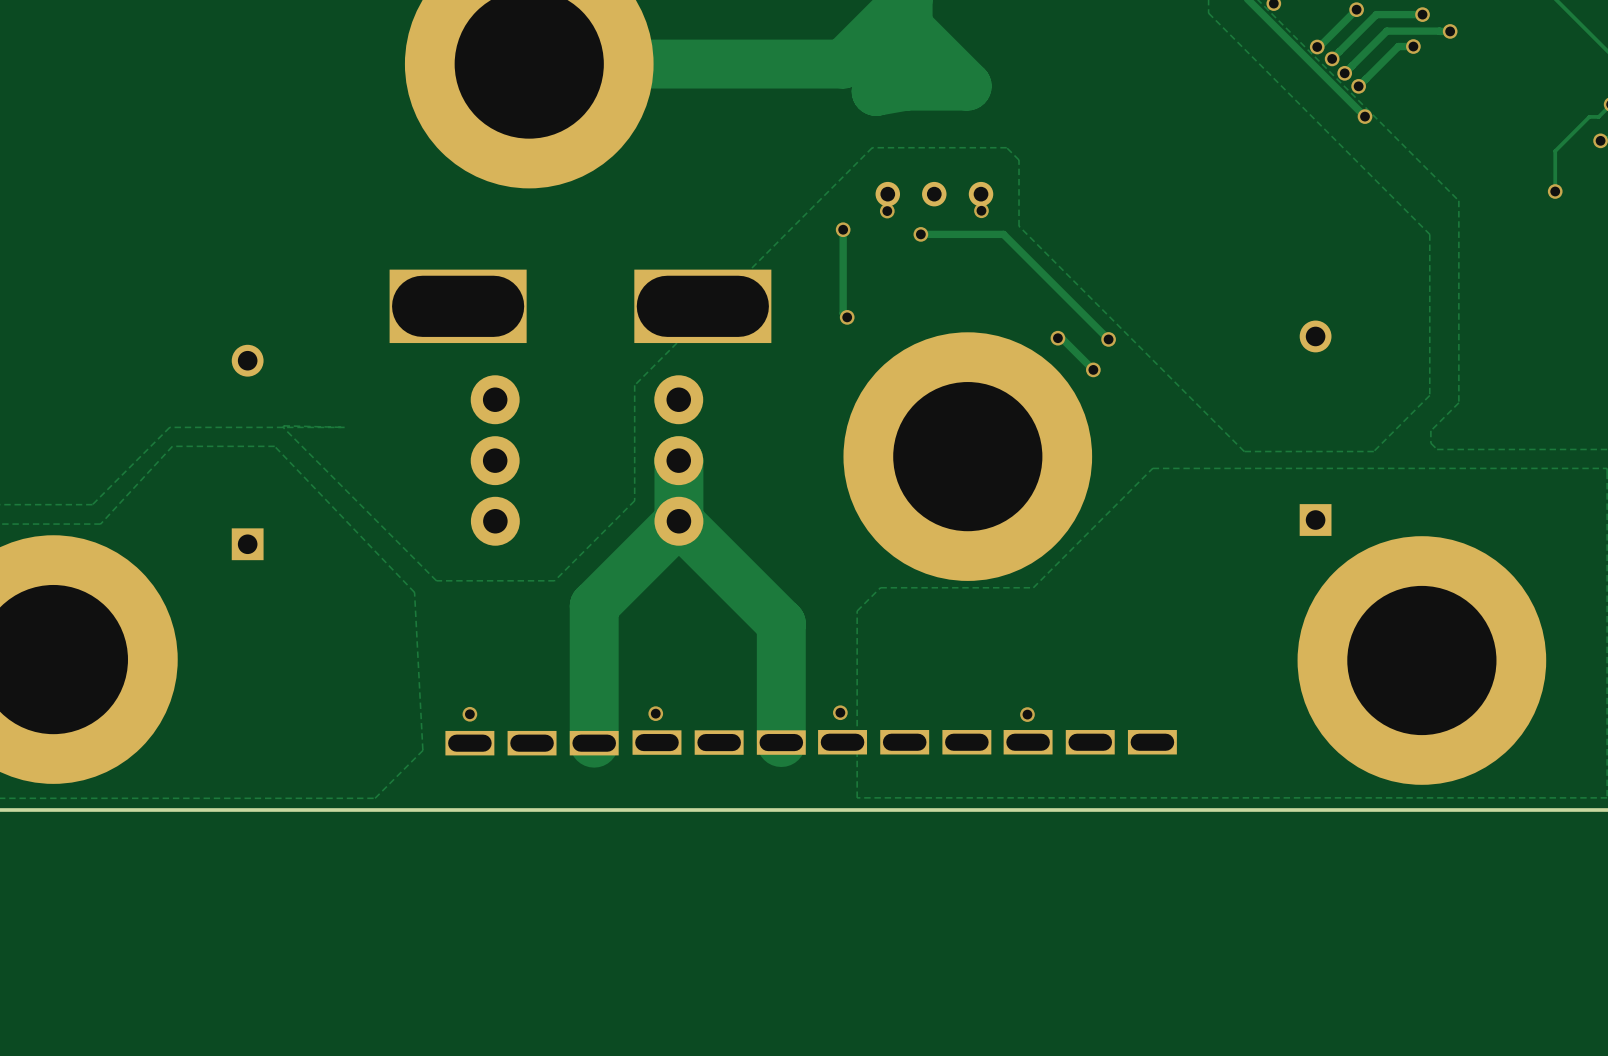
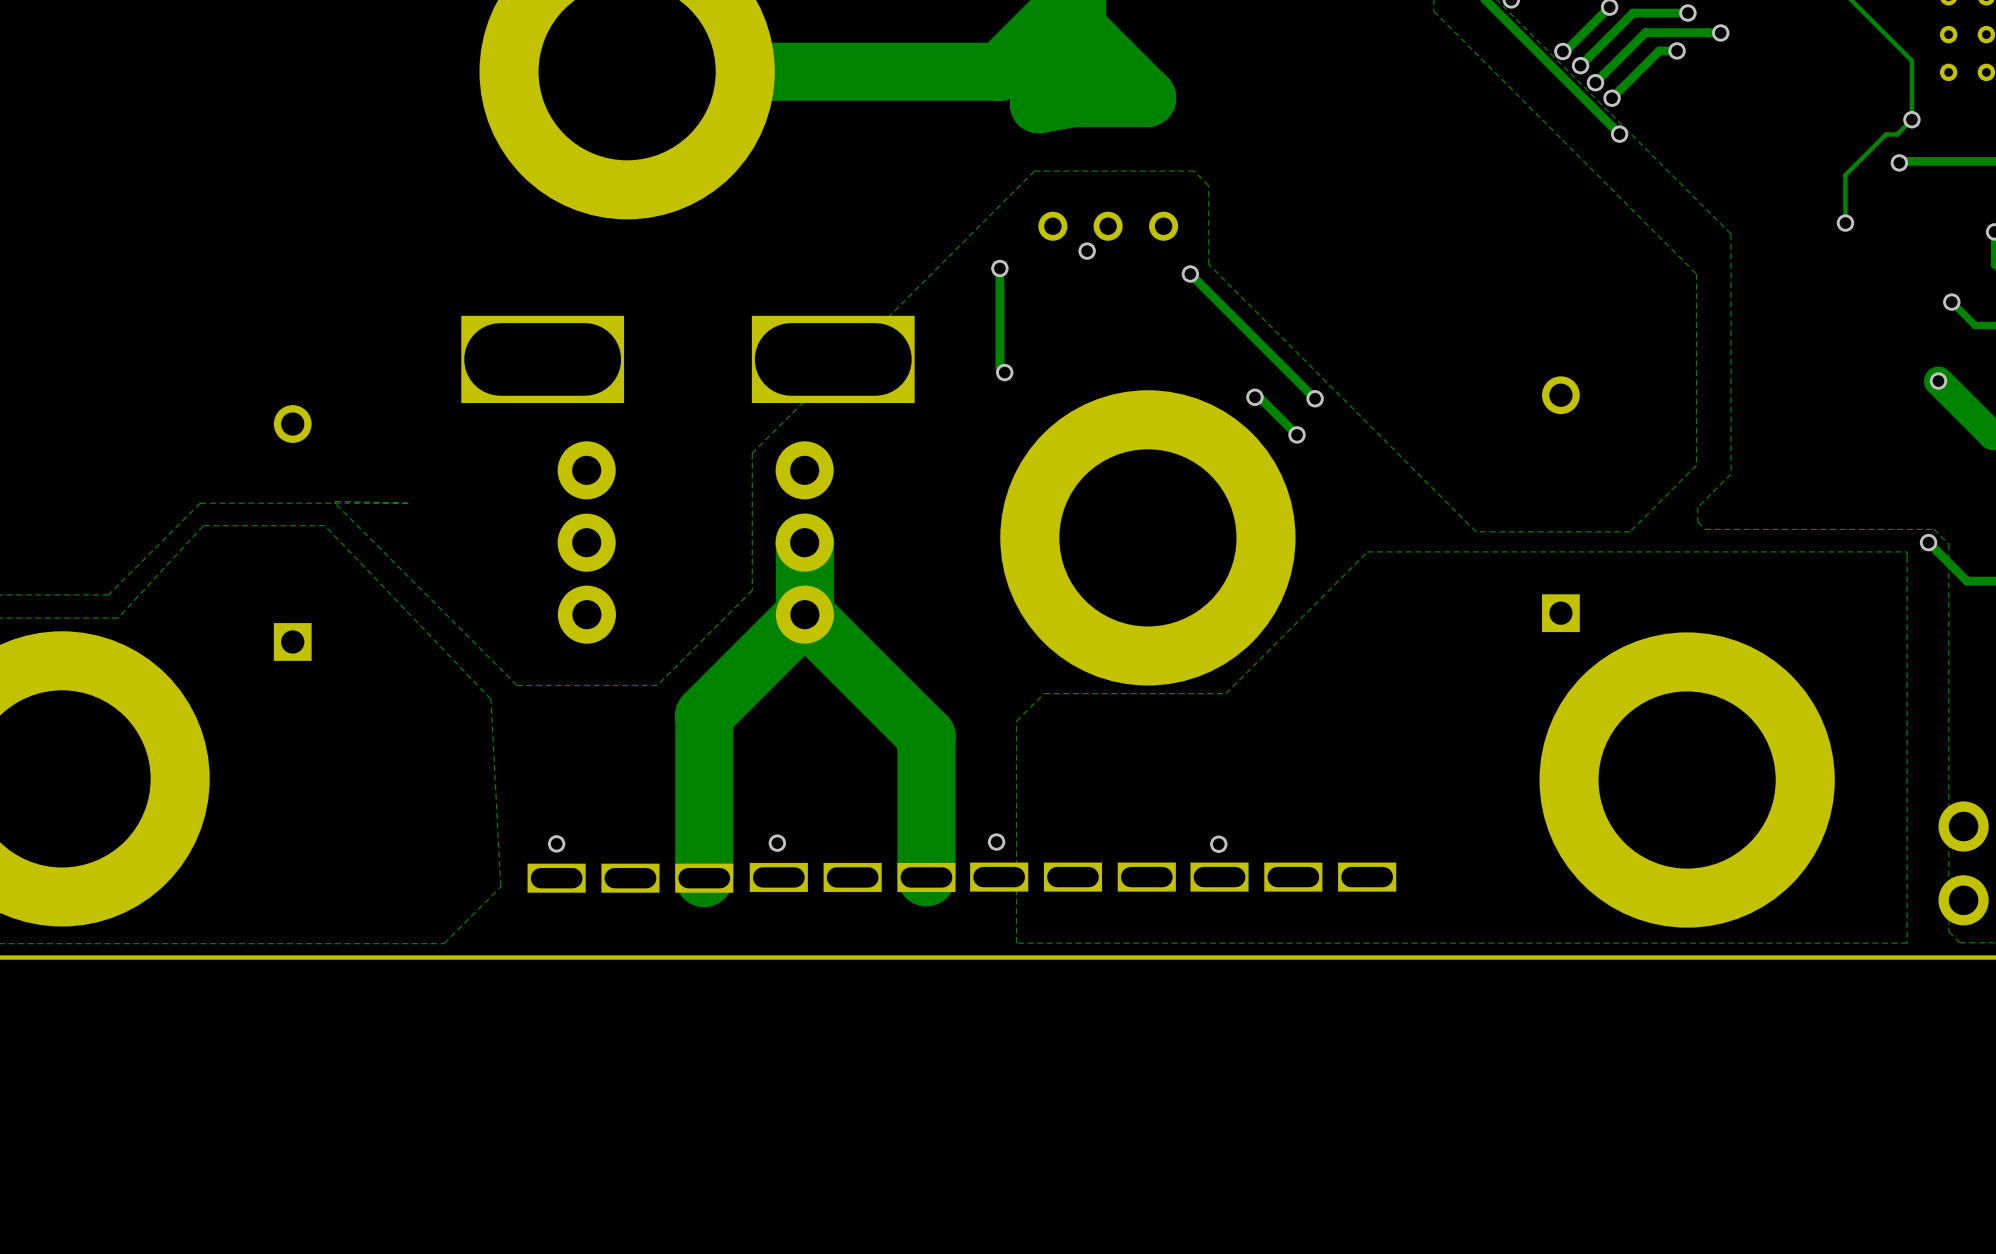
via: (981, 210) -> none
via: (887, 211) -> none
via: none -> (1087, 251)
via: (920, 234) -> none
track: (1003, 234) (920, 234) -> none
via: none -> (1190, 274)

